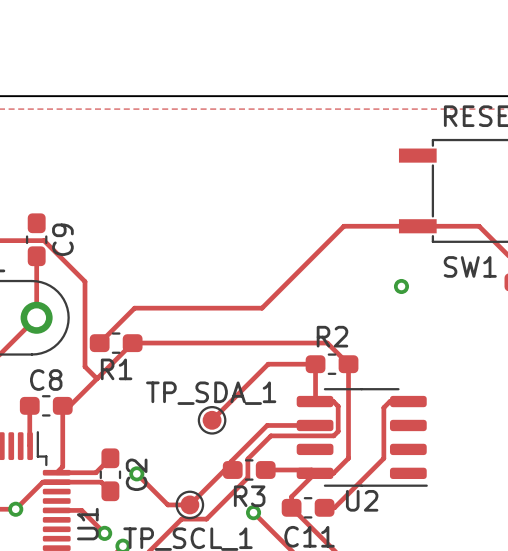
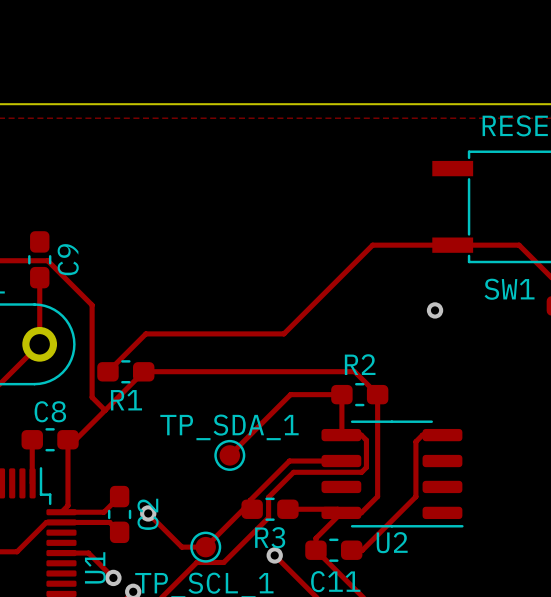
via: (15, 509) -> none

